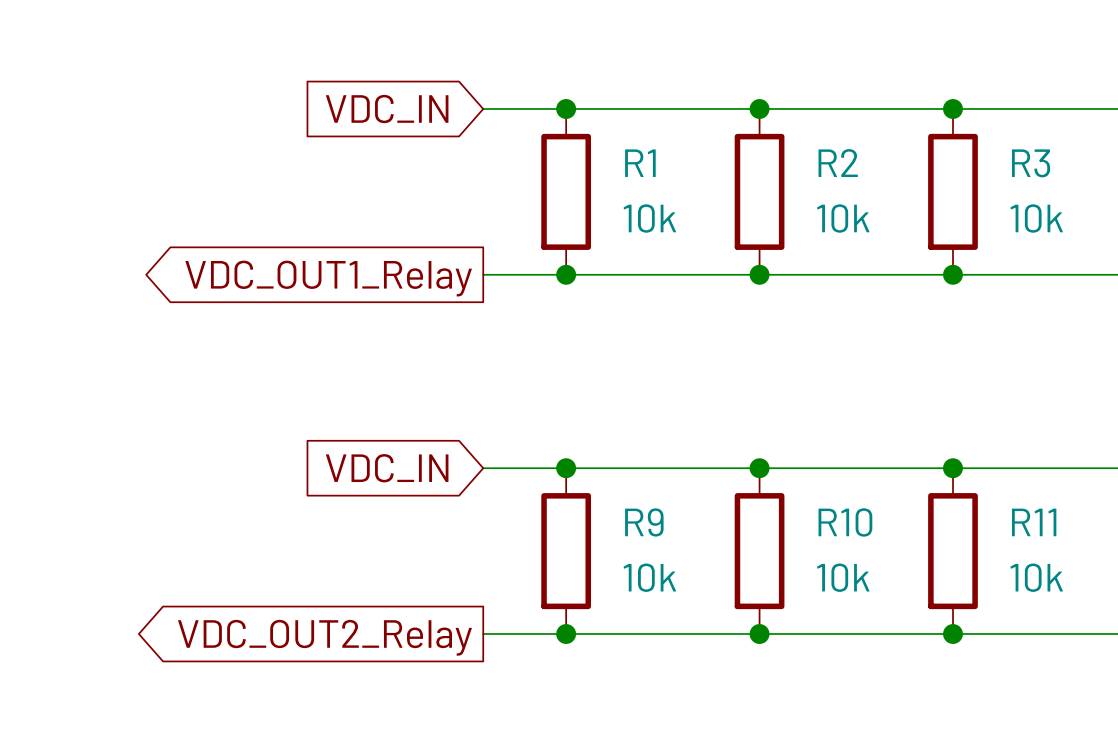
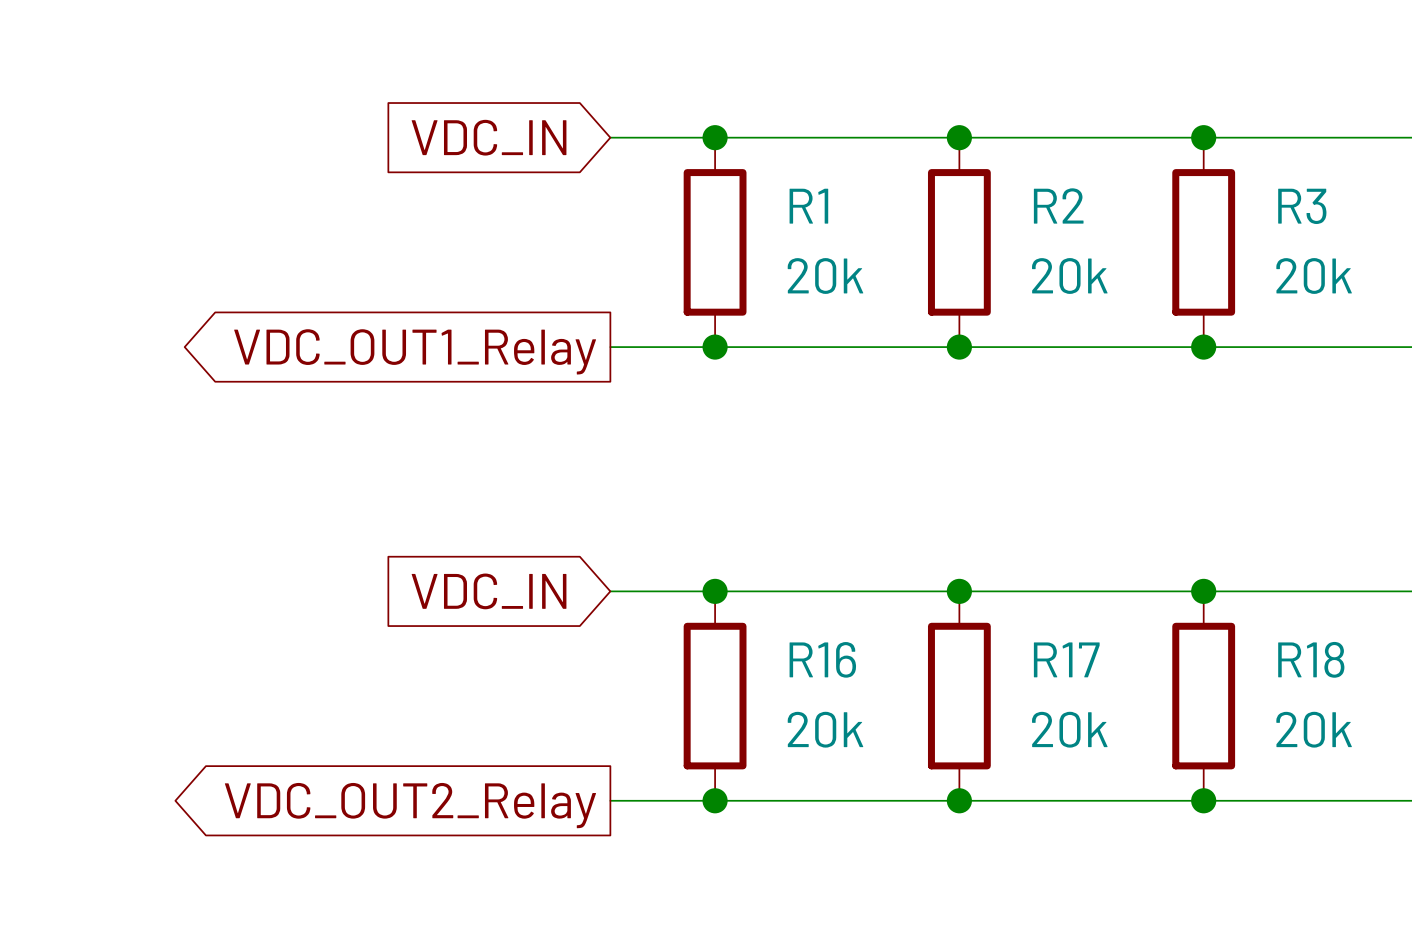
R1 value: 10k (649, 218) -> 20k (825, 275)
R2 value: 10k (843, 218) -> 20k (1069, 275)
R3 value: 10k (1036, 218) -> 20k (1314, 275)
R9 name: R9 (644, 522) -> R16 (822, 659)
R10 name: R10 (845, 522) -> R17 (1066, 659)
R11 name: R11 (1034, 522) -> R18 (1311, 659)
R9 value: 10k (649, 577) -> 20k (825, 729)
R10 value: 10k (843, 577) -> 20k (1069, 729)
R11 value: 10k (1036, 577) -> 20k (1314, 729)

